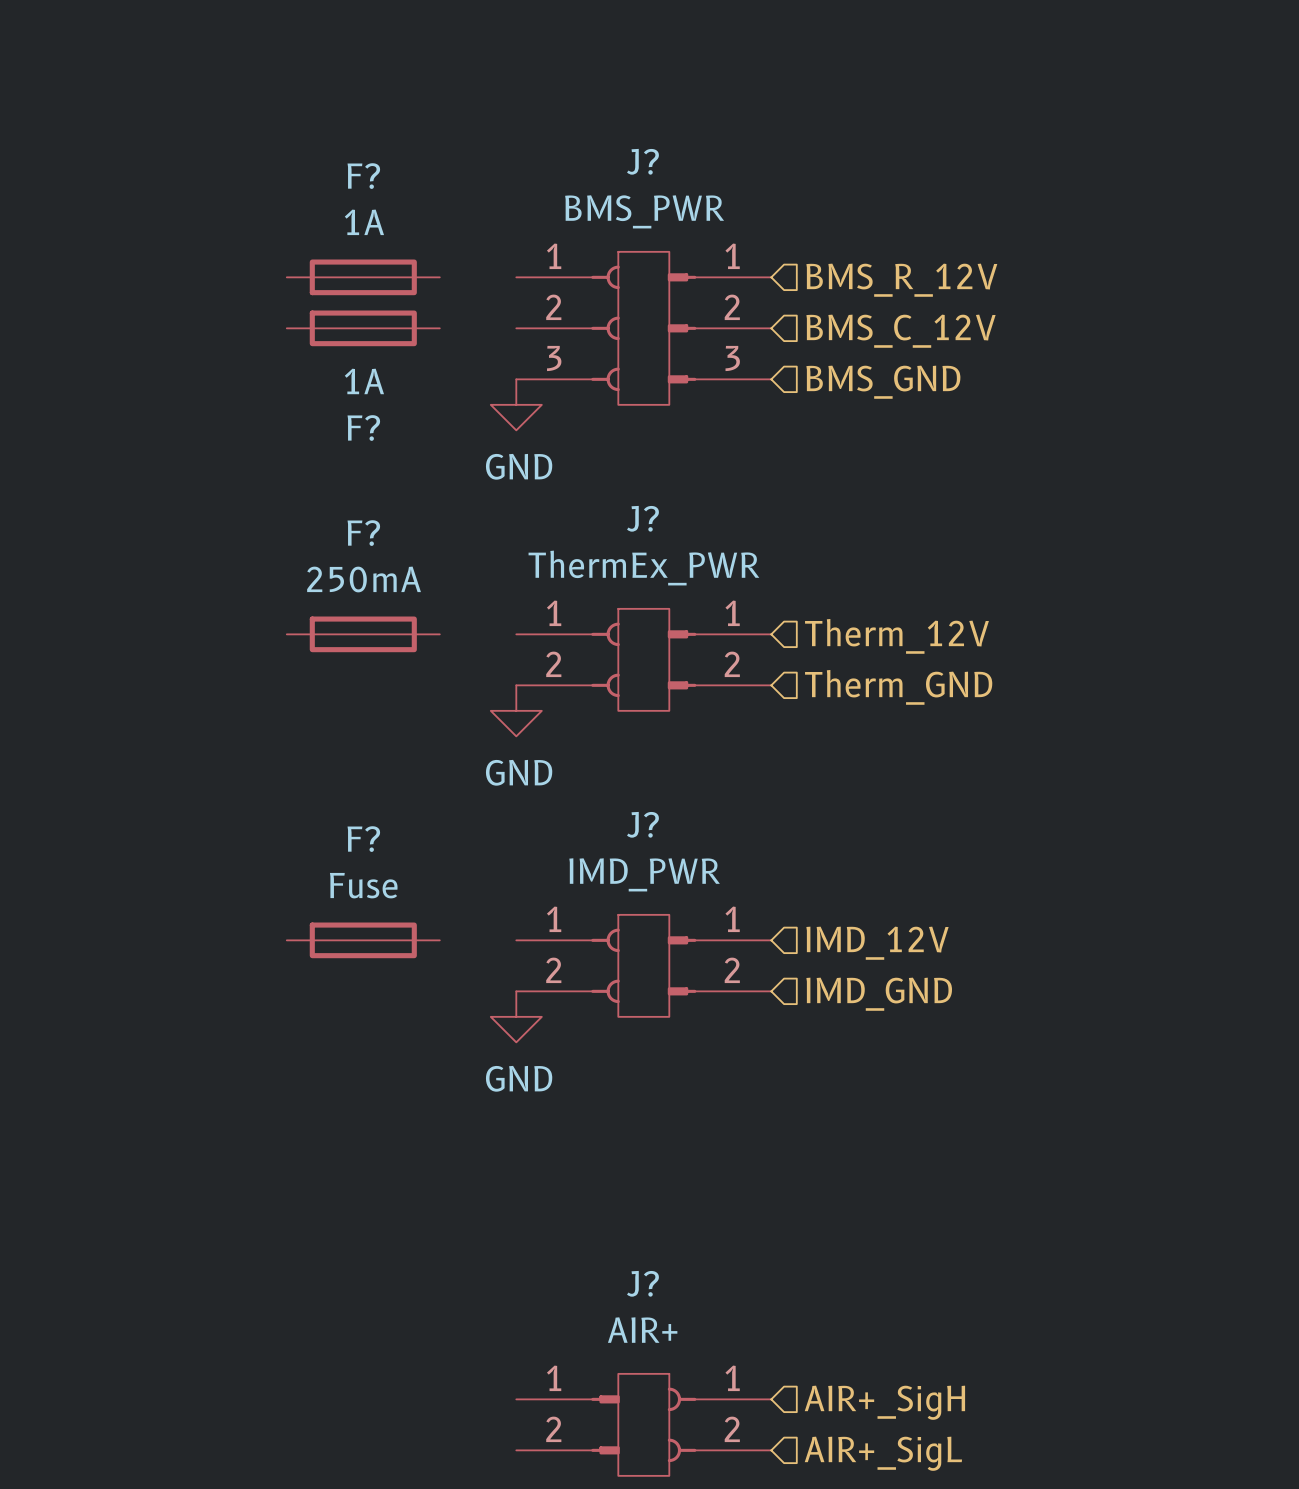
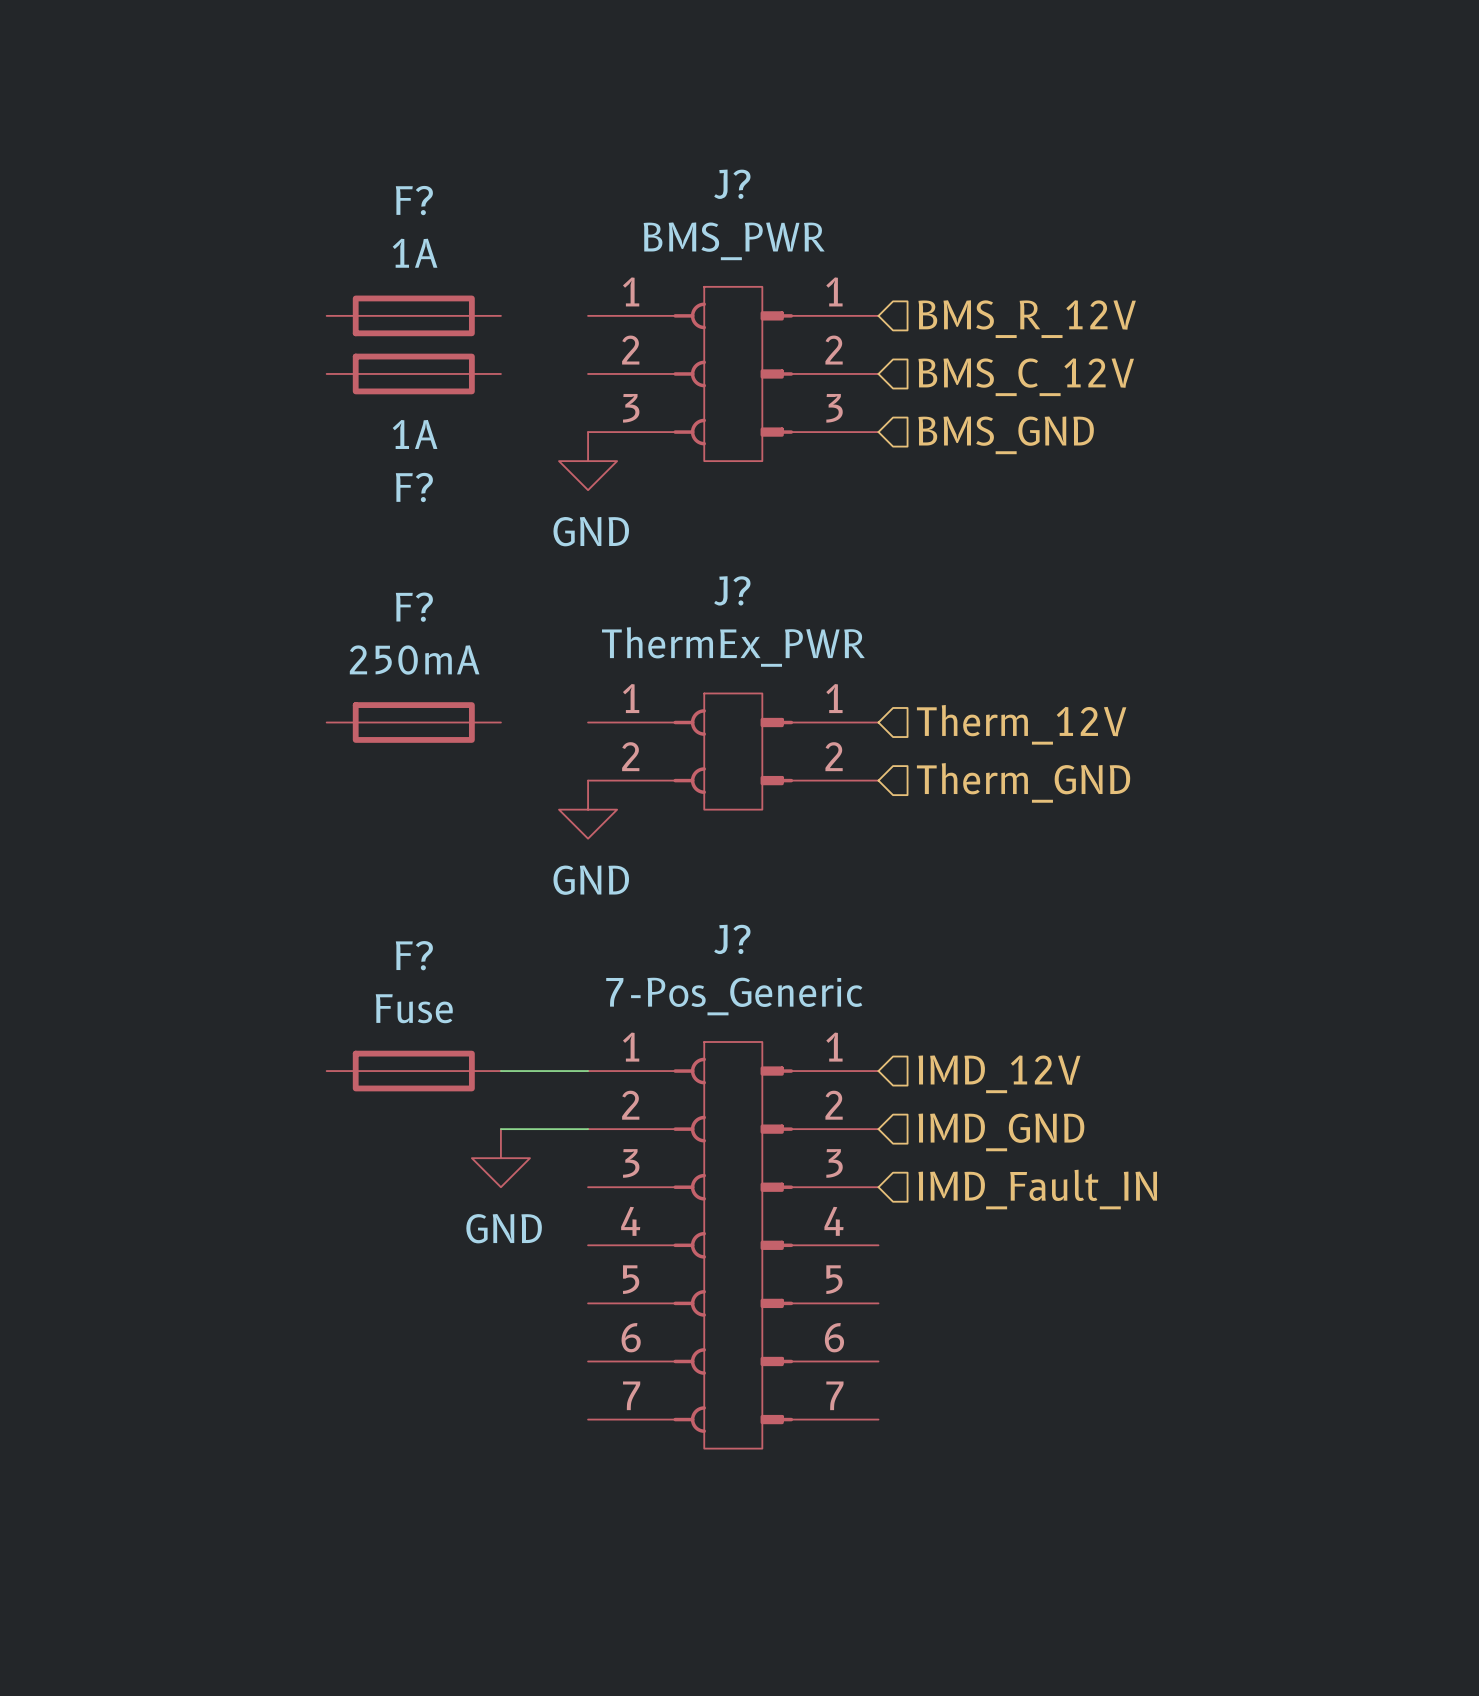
wire: none -> (500, 1071) (588, 1071)
J?: IMD_PWR (643, 965) -> none
wire: none -> (500, 1129) (588, 1129)
power symbol position: GND (516, 1016) -> GND (500, 1158)
hierarchical label: none -> IMD_Fault_IN (1037, 1189)
J?: none -> 7-Pos_Generic (733, 1245)
hierarchical label: AIR+_SigH (884, 1402) -> none
J?: AIR+ (643, 1424) -> none
hierarchical label: AIR+_SigL (883, 1453) -> none

